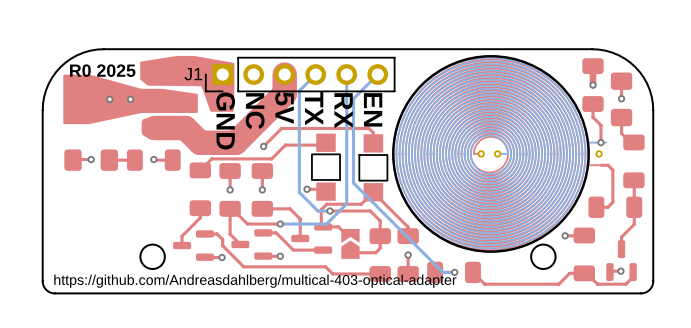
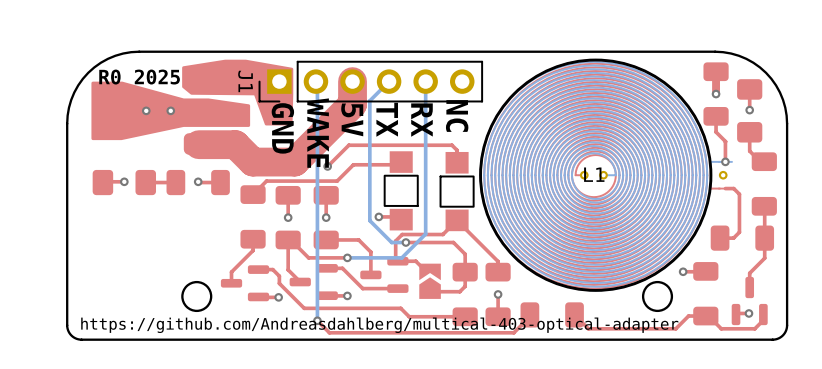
J1 name rotation: 0° (193, 74) -> 90° clockwise (245, 81)
bottom track: (377, 74) (353, 98) (353, 183) (442, 272) (454, 272) -> none
bottom track: none -> (317, 83) (317, 320)
text: EN (373, 109) -> NC (457, 116)
text: NC (255, 111) -> WAKE (318, 133)
L1 name: none -> L1 (594, 174)
via: (454, 272) -> none
top track: none -> (529, 316) (513, 332) (329, 332) (317, 320)
via: none -> (317, 320)

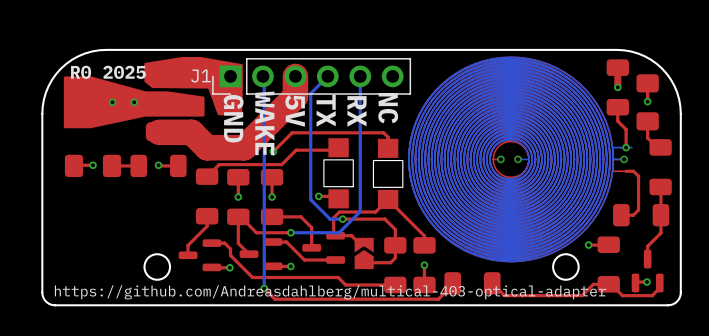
drawing: [479, 58, 713, 292] -> none
J1 name rotation: 0° (245, 81) -> 90° counterclockwise (201, 76)
L1: (606, 175) -> none
part: none -> (520, 159)

